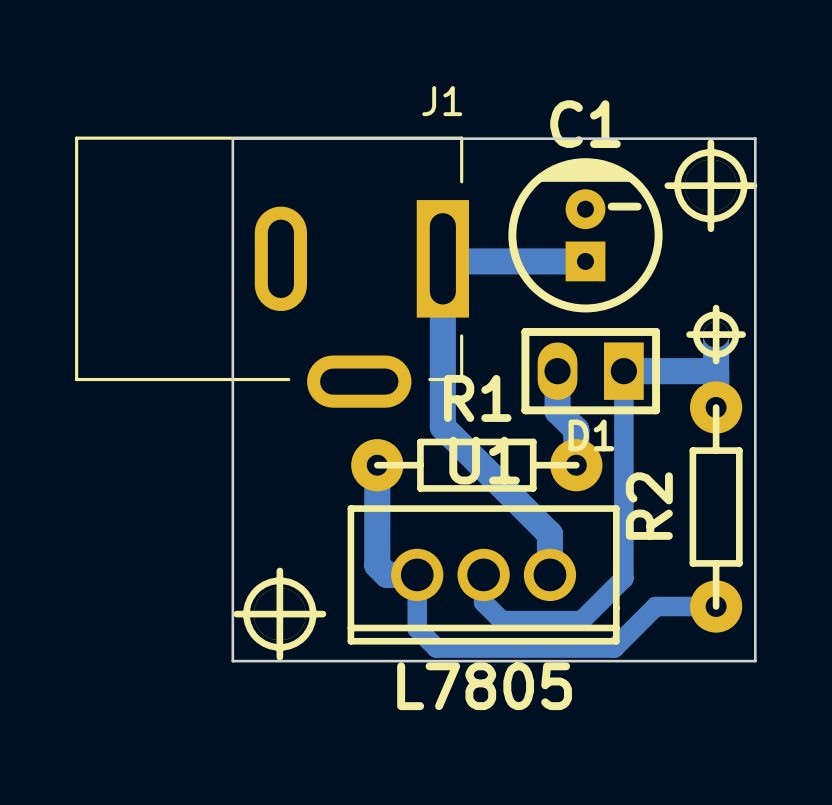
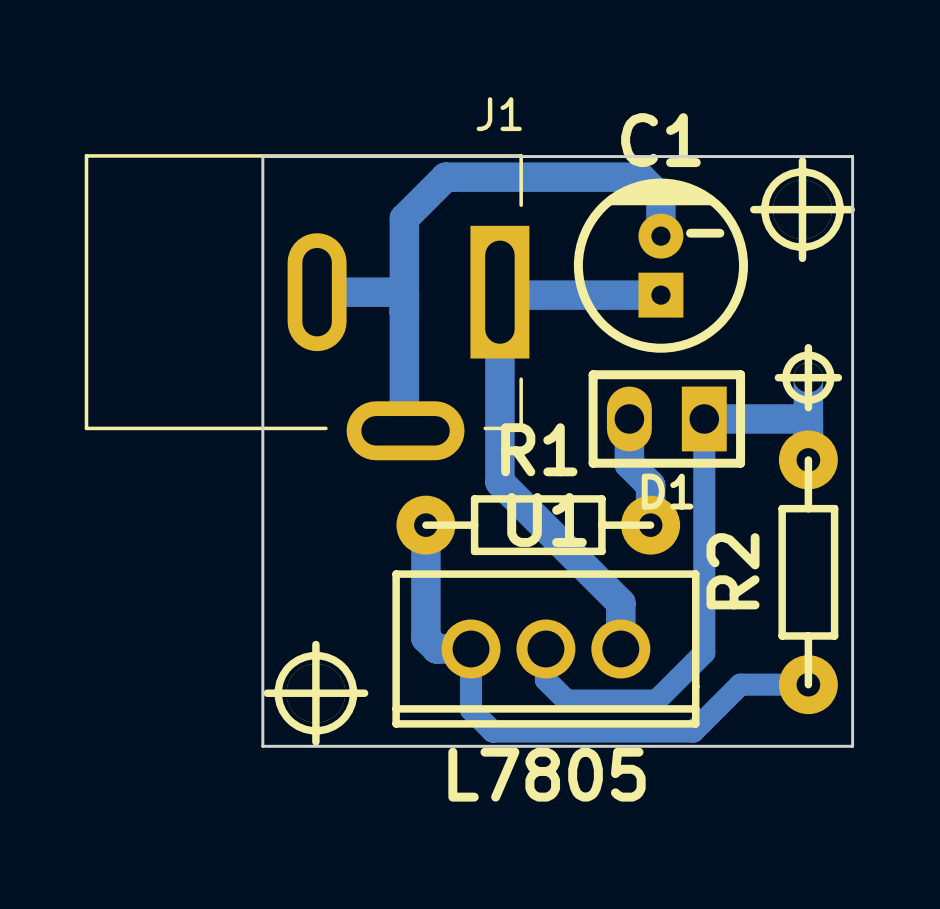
bottom track: none -> (660, 236) (660, 197) (640, 177) (445, 177) (404, 218) (404, 429)
bottom track: none -> (317, 292) (404, 292)

